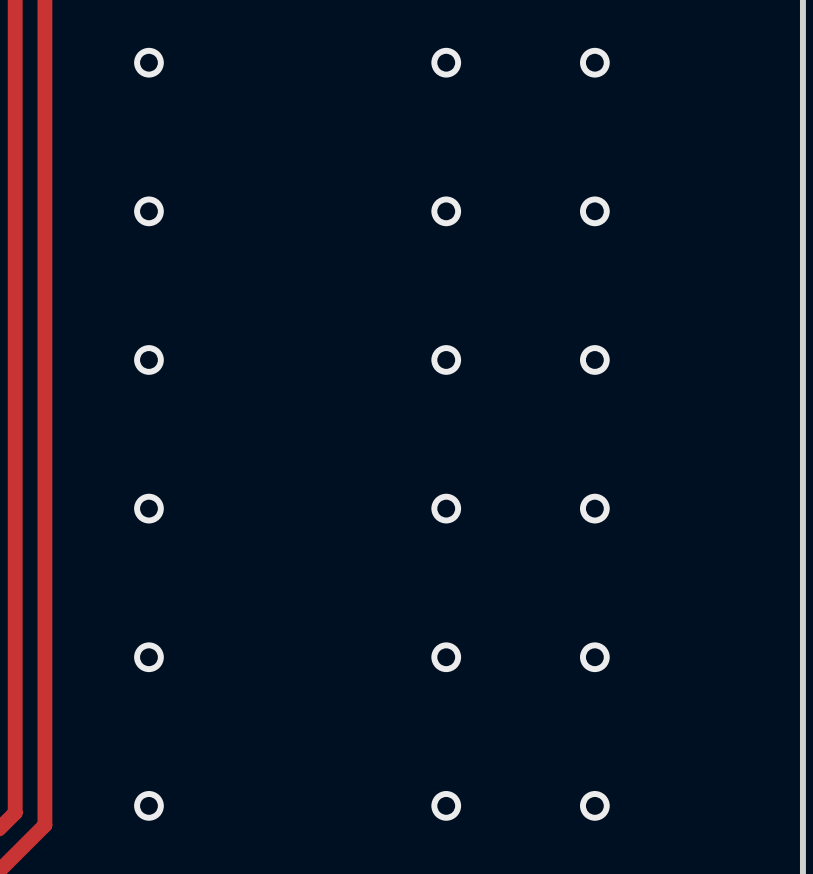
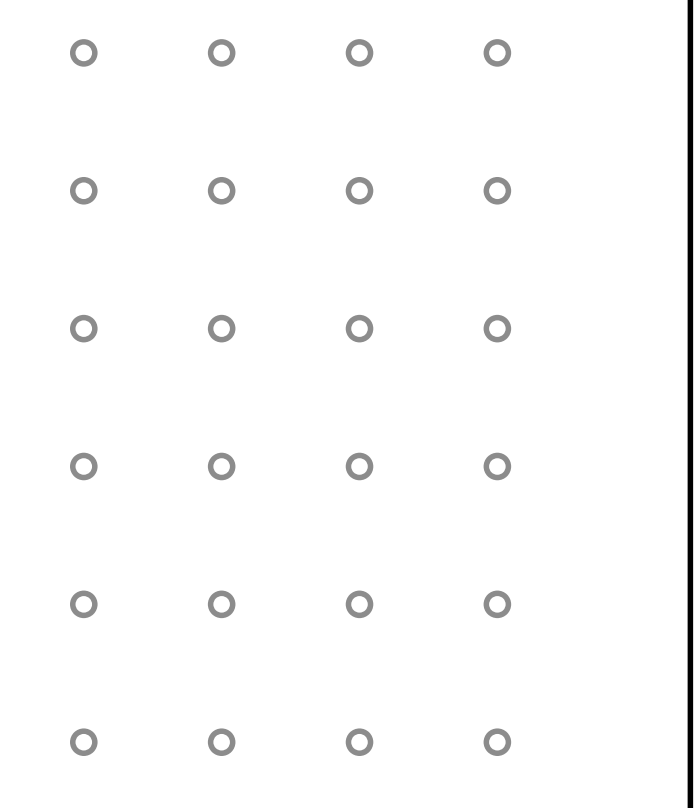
via: none -> (221, 52)
via: none -> (221, 190)
via: none -> (221, 328)
via: none -> (221, 466)
via: none -> (221, 604)
via: none -> (221, 742)

